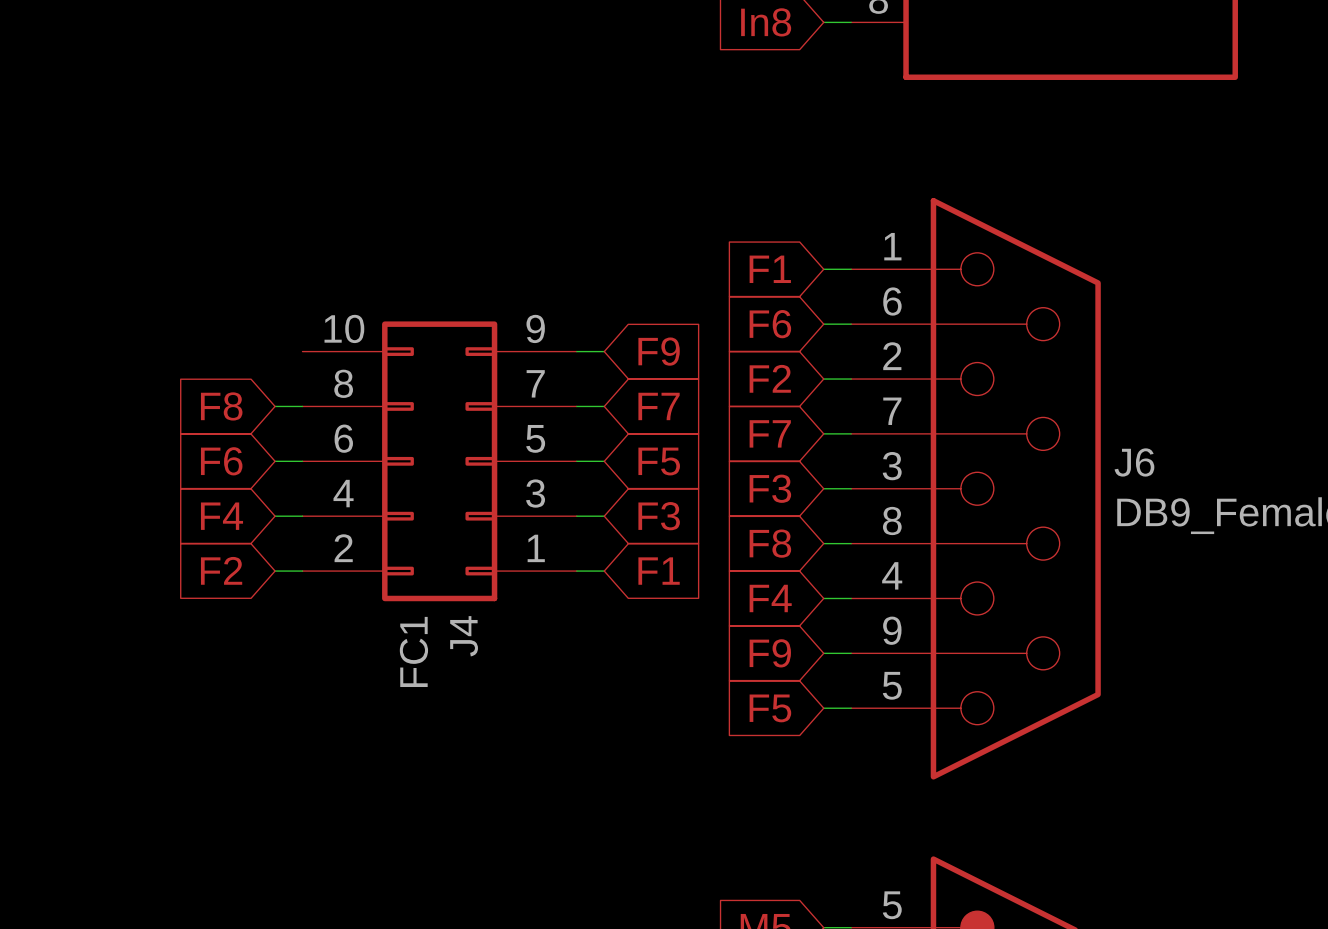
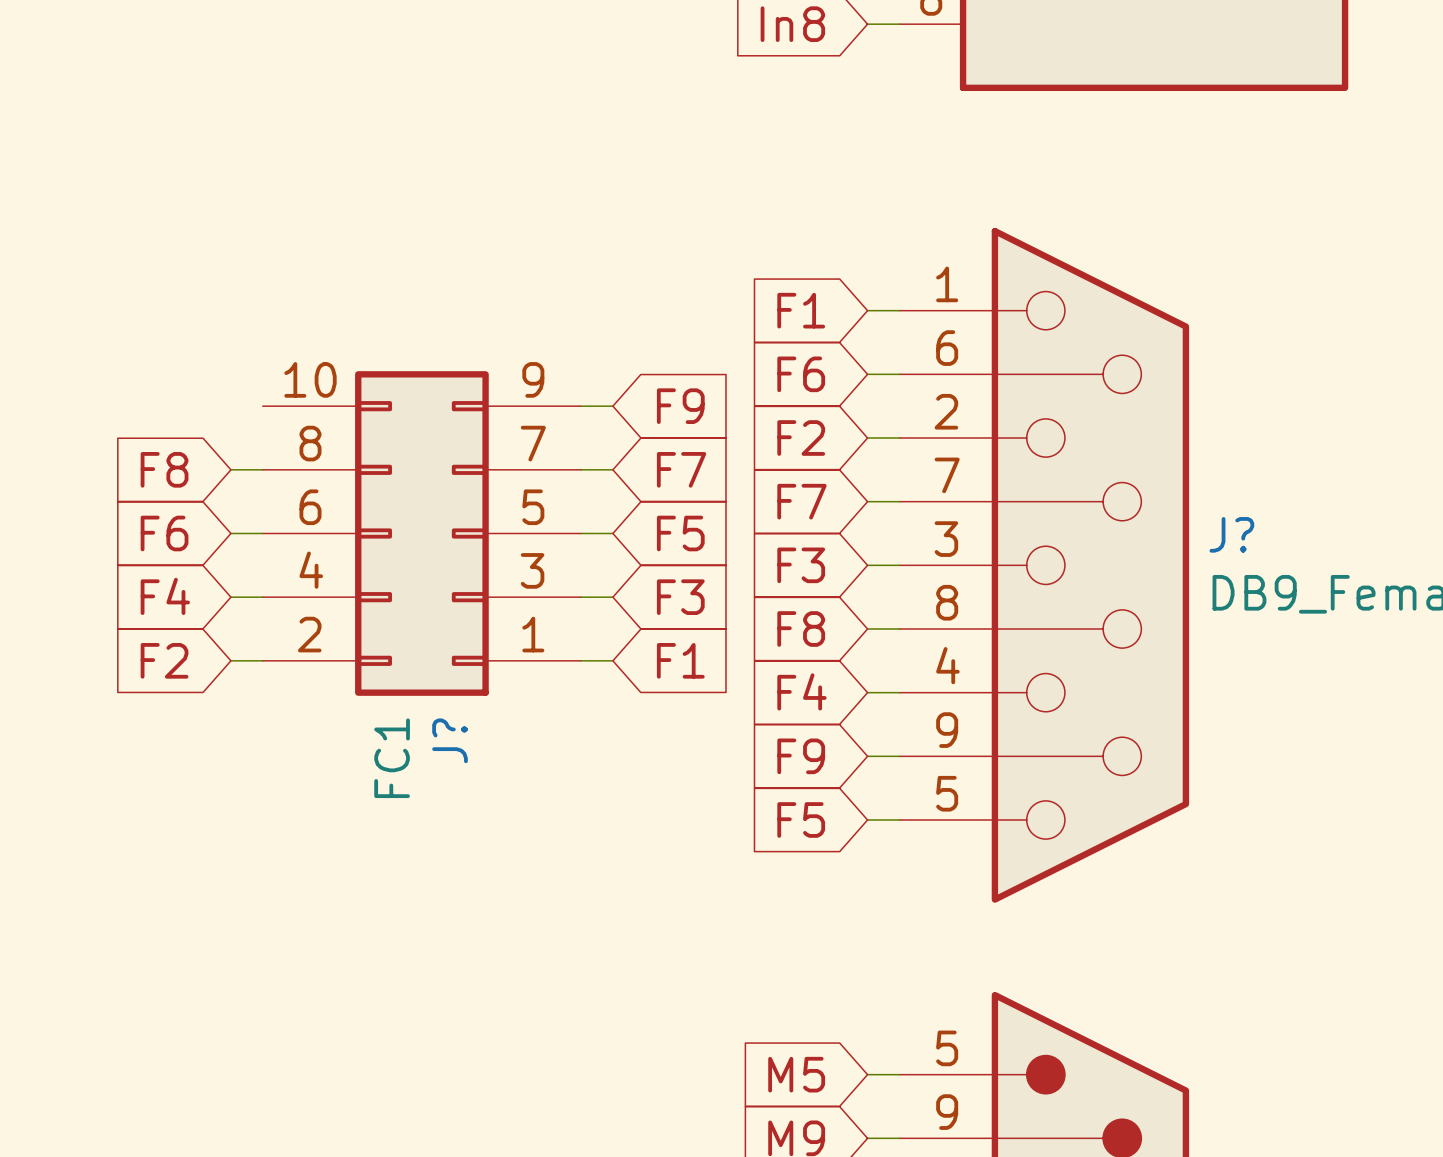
J6 name: J6 (1134, 462) -> J? (1231, 534)
J4 name: J4 (464, 636) -> J? (450, 740)

